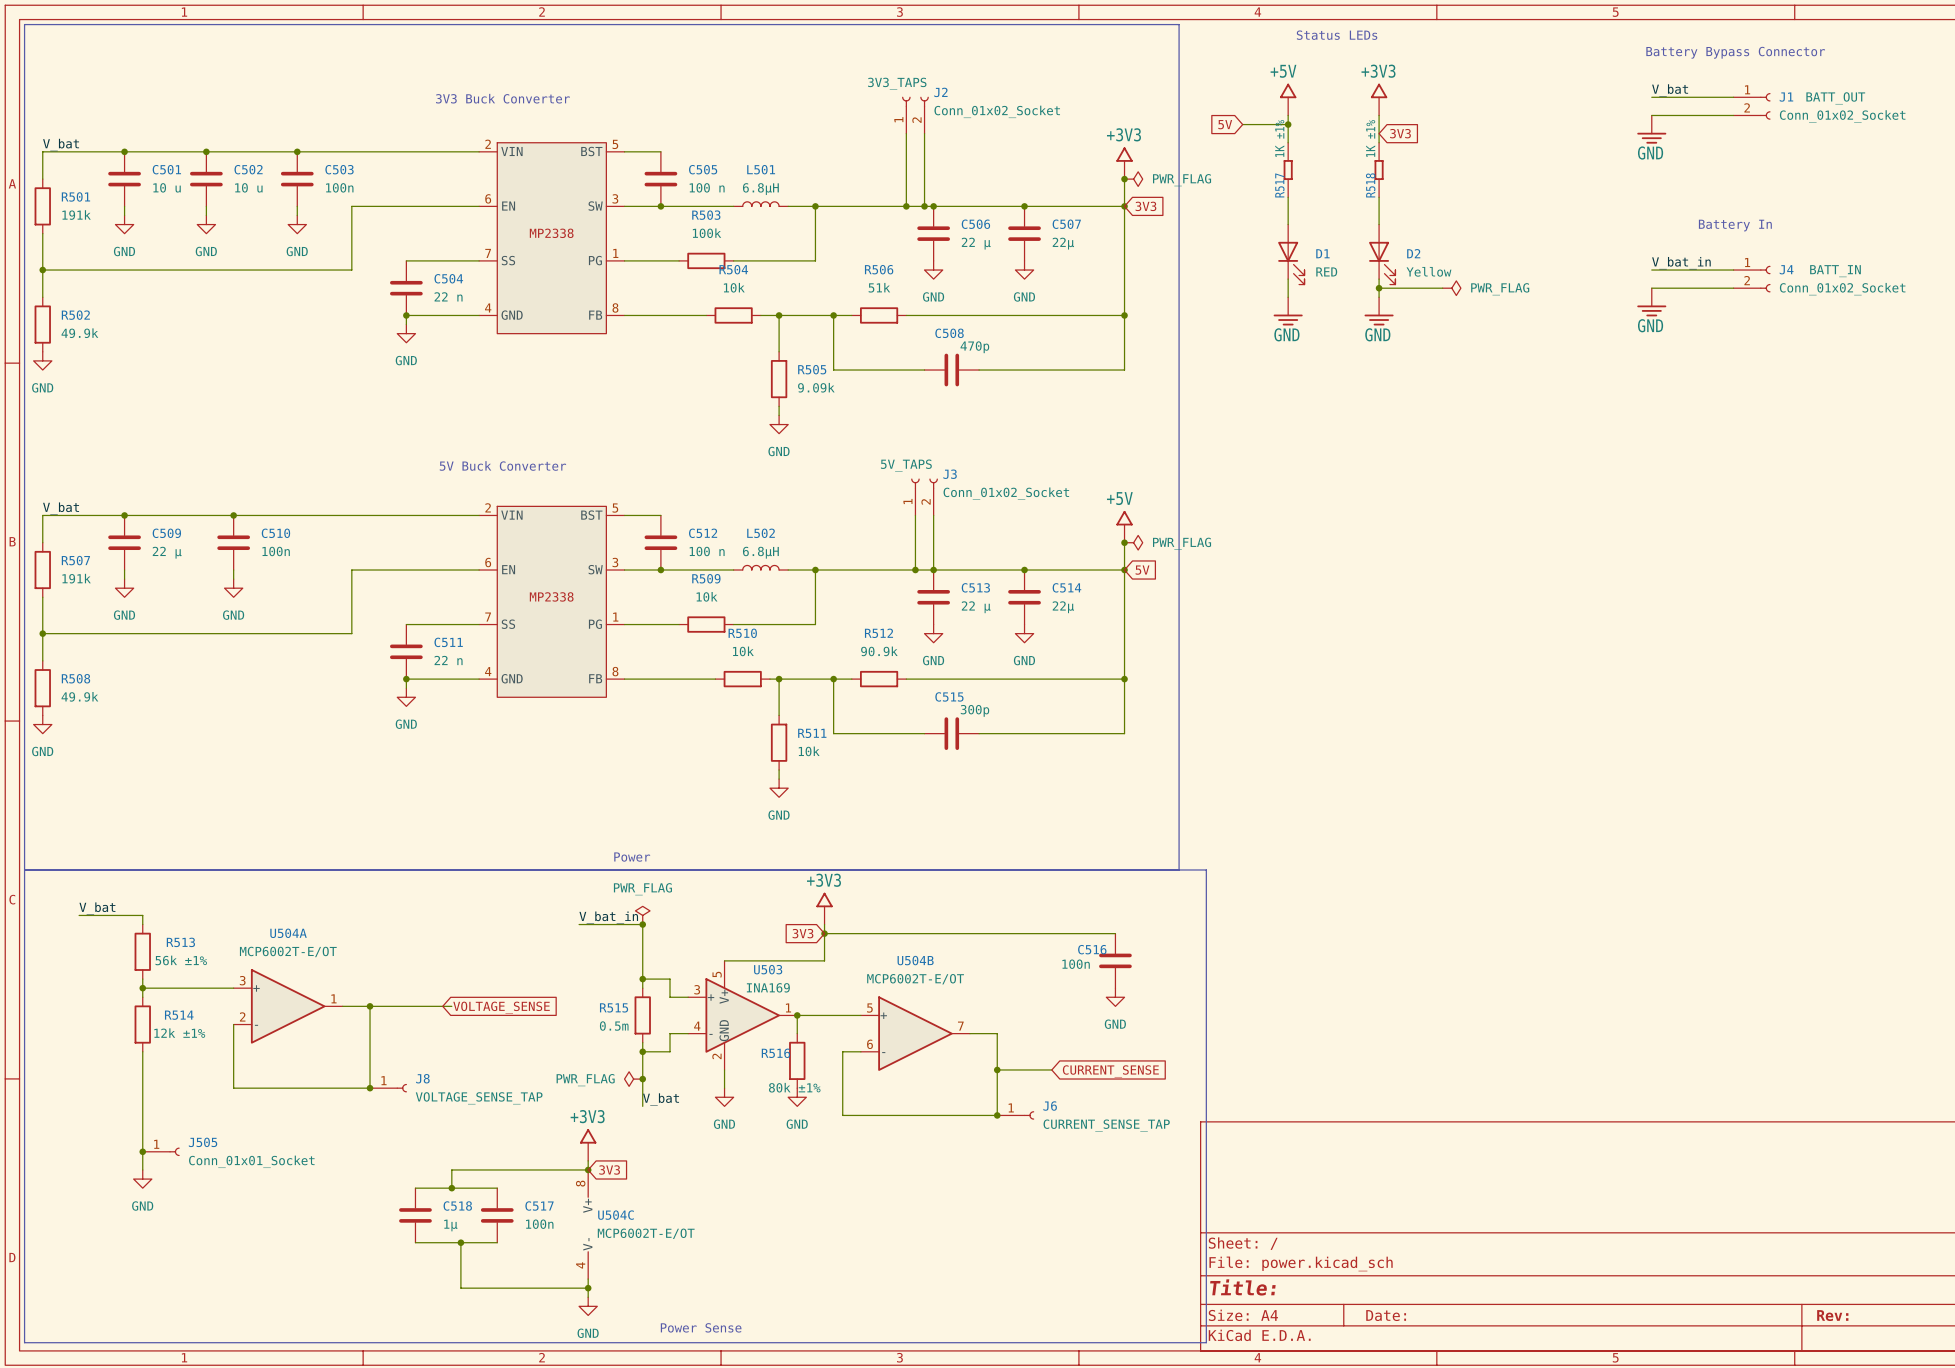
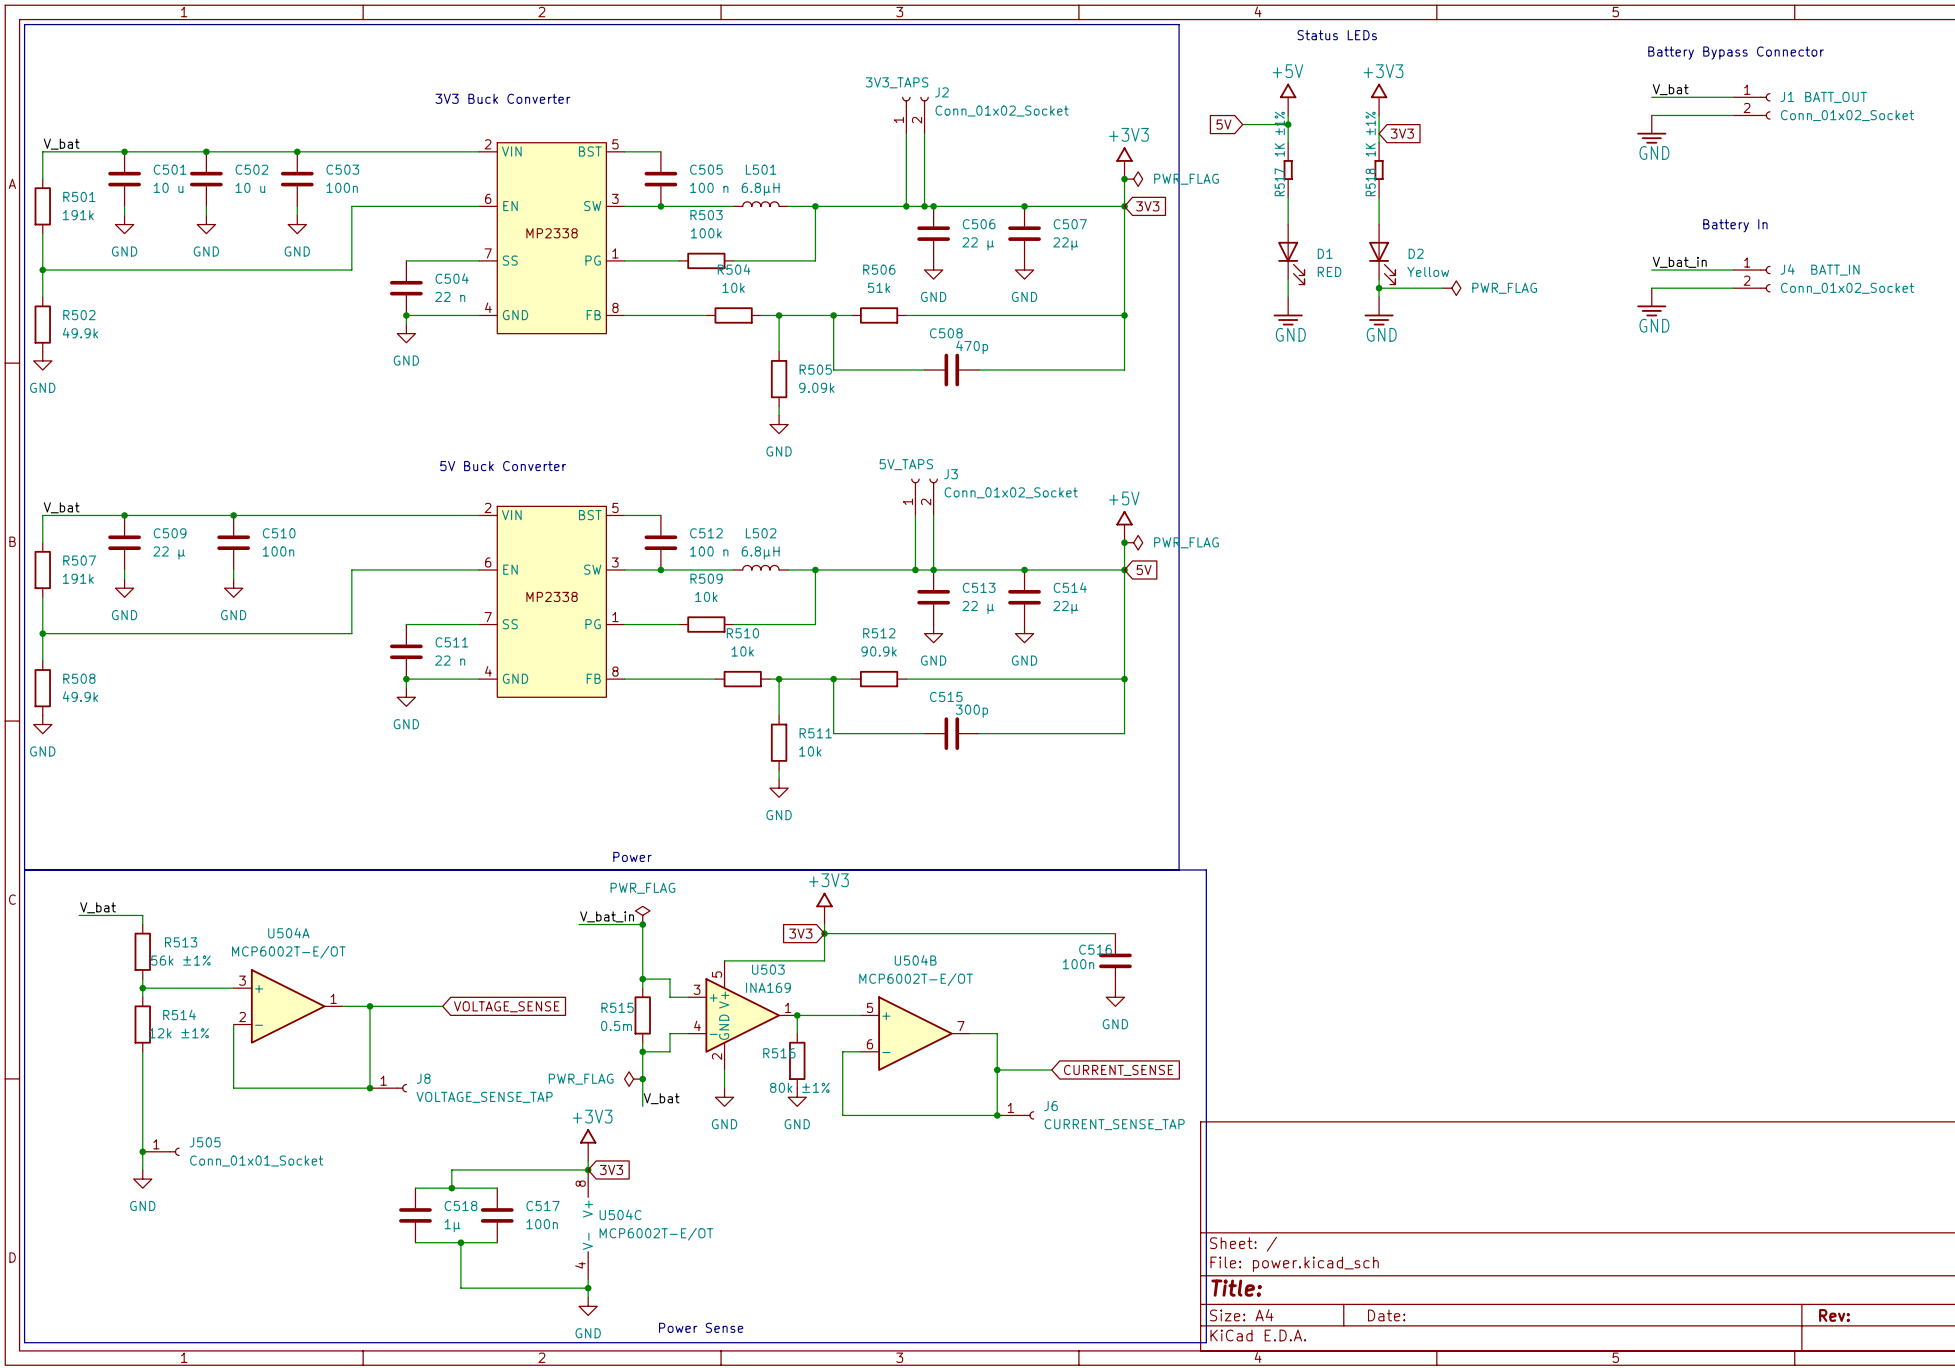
wire: (442, 1006) (451, 1006) -> none

